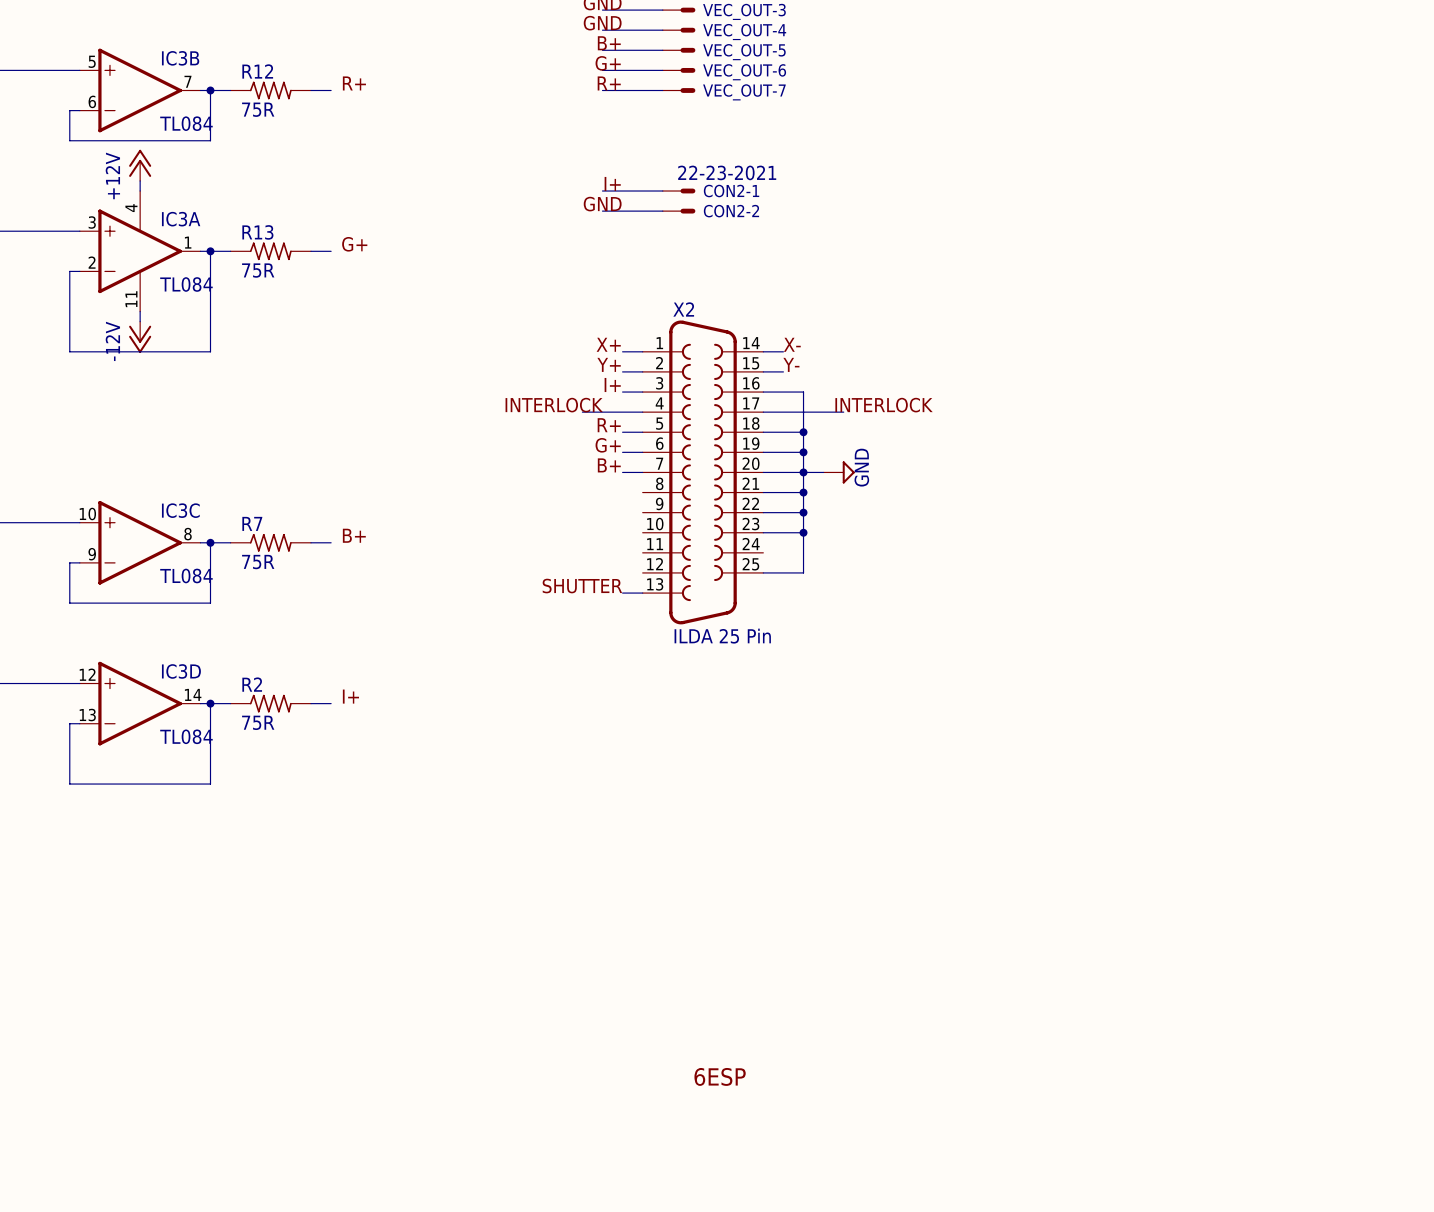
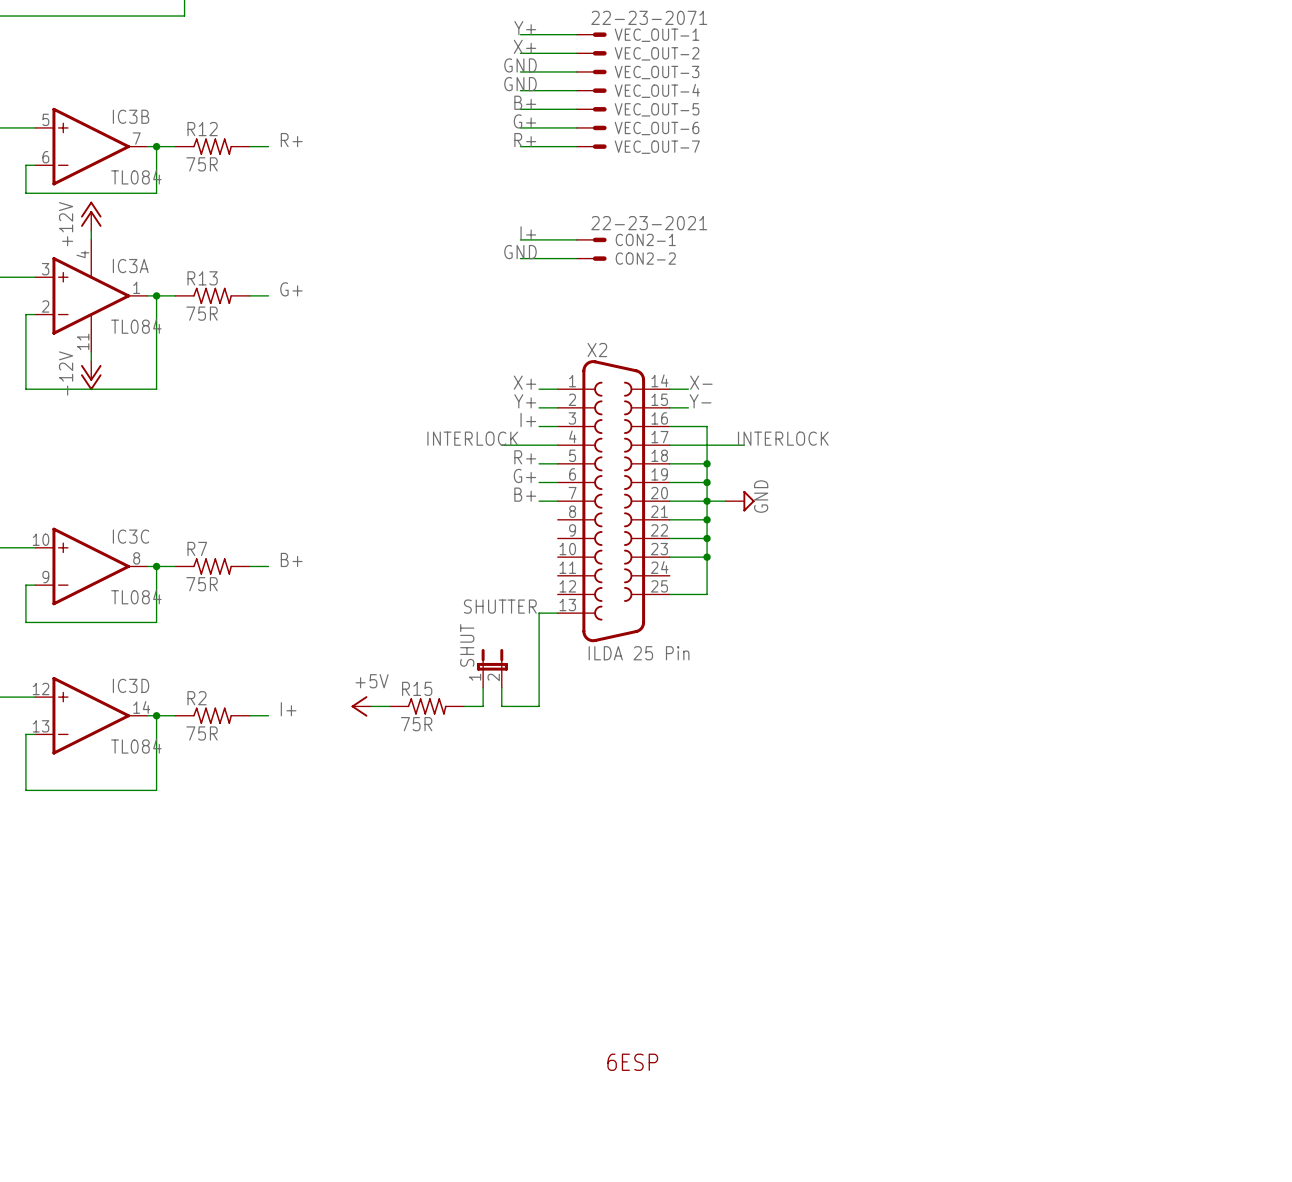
wire: none -> (539, 613) (539, 706) (501, 706) (501, 687)
SHUT: none -> (492, 668)
wire: none -> (483, 687) (483, 706) (464, 706)
power symbol: none -> +5V (361, 706)
wire: none -> (371, 706) (389, 706)
R15: none -> 75R (427, 706)

